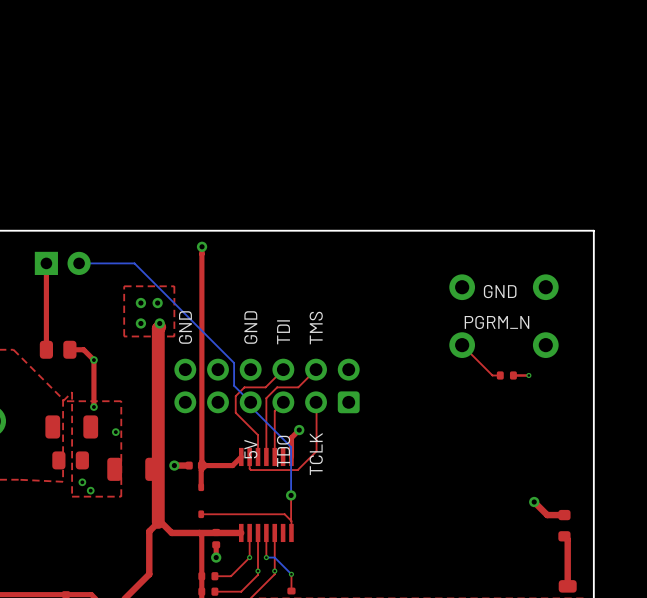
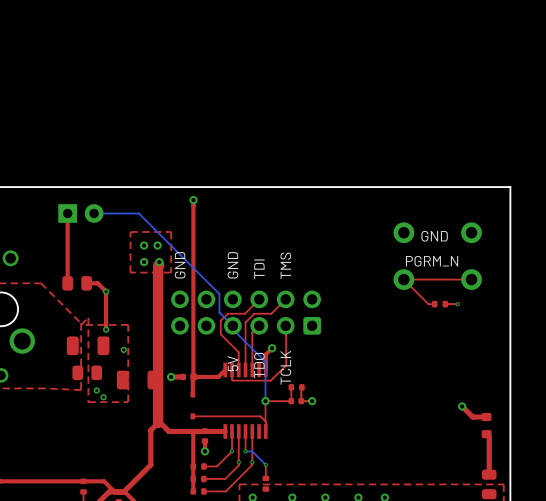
top track: none -> (471, 279) (403, 279)
top track: none -> (291, 387) (291, 401)
part: none -> (296, 387)
top track: none -> (301, 388) (301, 401) (312, 401)
top track: none -> (290, 401) (265, 401)
part: none -> (296, 401)
via: none -> (312, 401)

